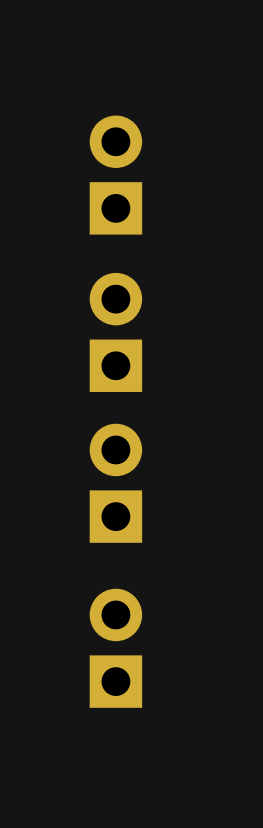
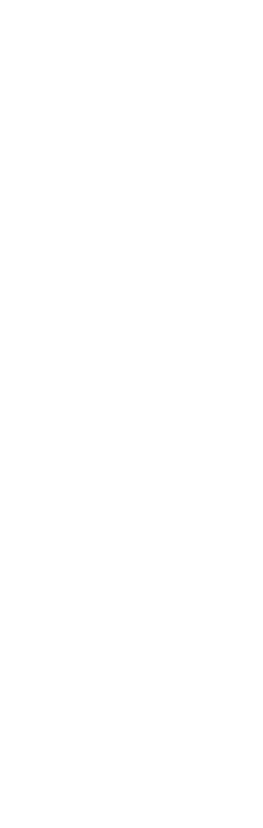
part: (115, 175) -> none
part: (115, 332) -> none
part: (115, 483) -> none
part: (115, 648) -> none

